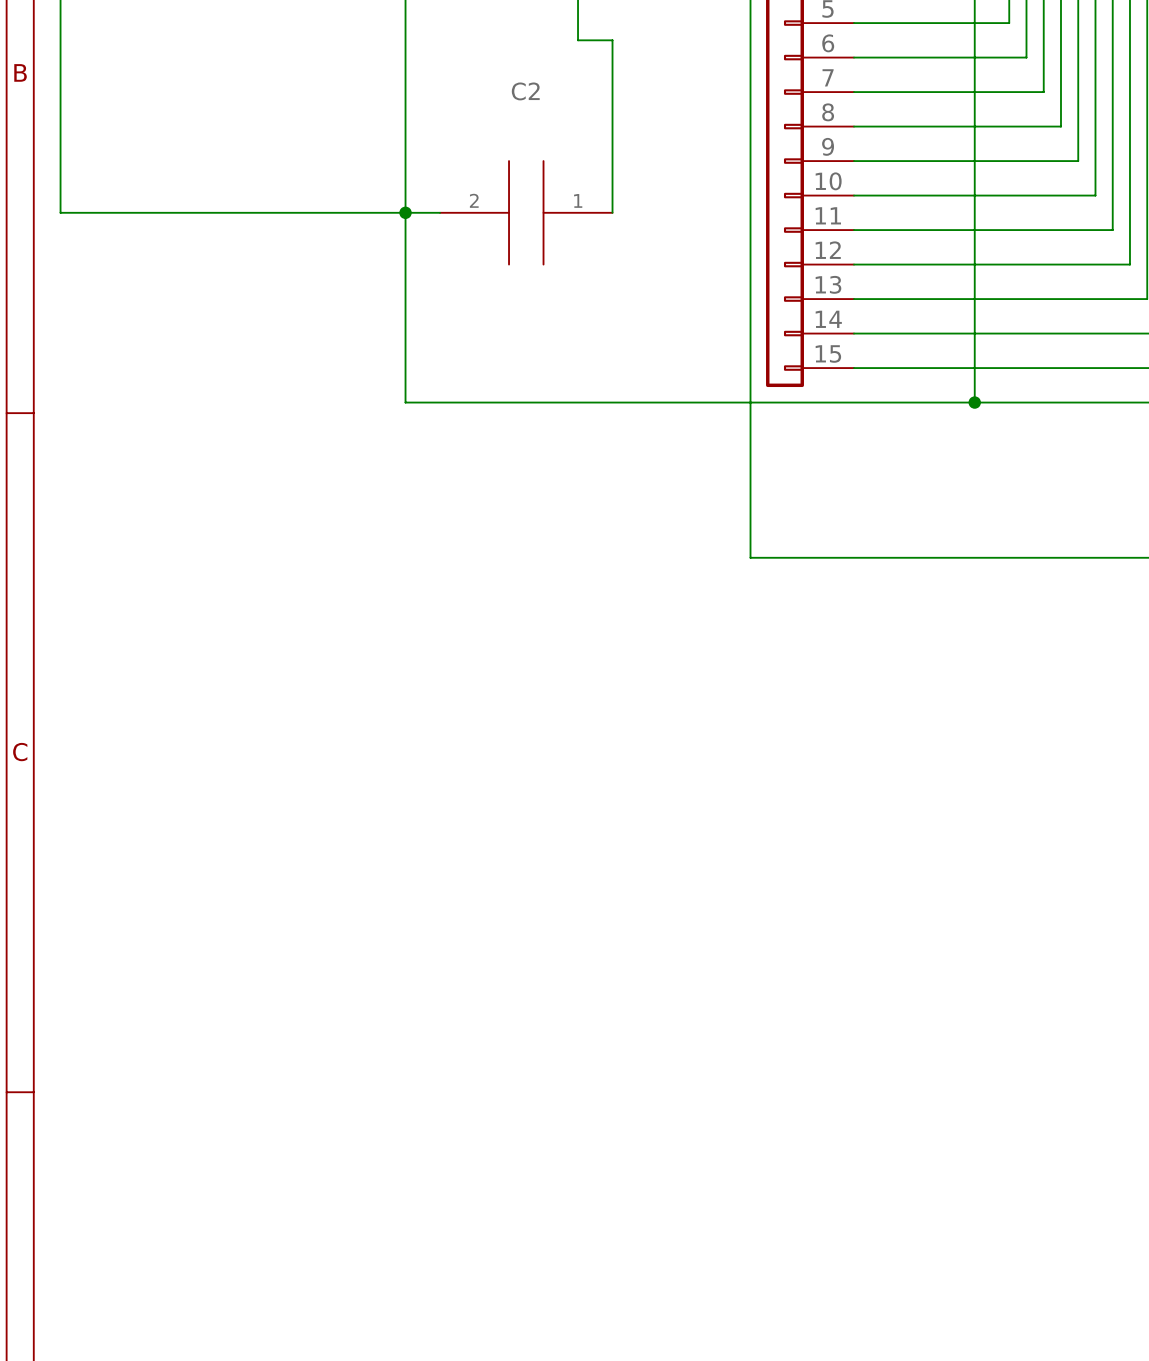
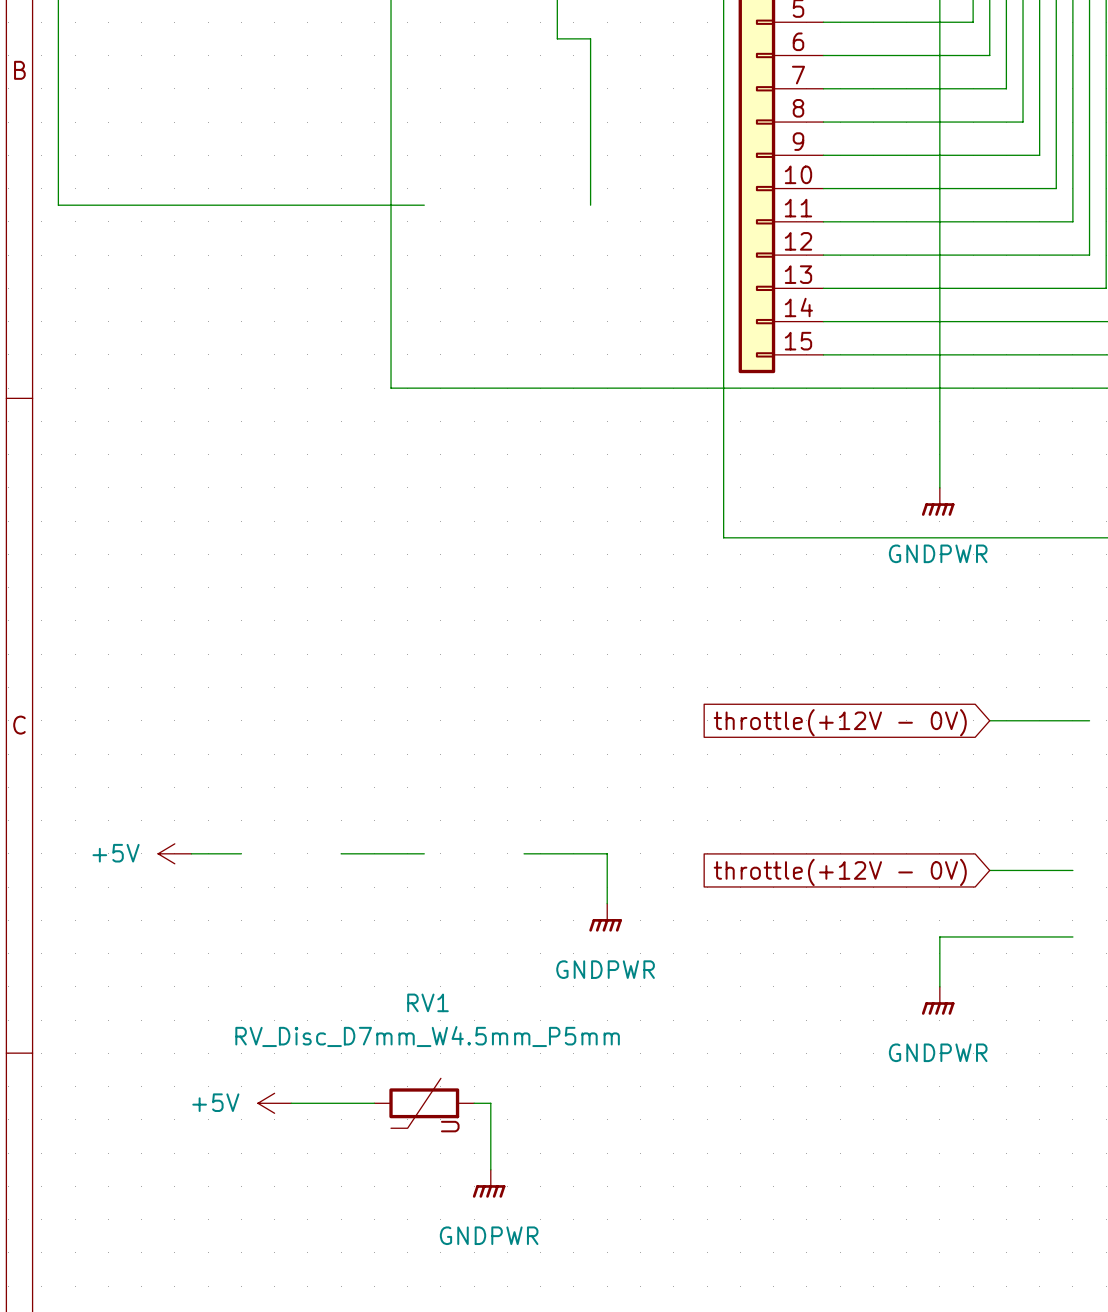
junction: (405, 212) -> none
C2: (526, 212) -> none
wire: none -> (939, 388) (939, 487)
junction: (974, 402) -> none
power symbol: none -> GNDPWR (938, 501)
wire: none -> (989, 720) (1089, 720)
global label: none -> throttle(+12V - 0V) (840, 722)
power symbol: none -> +5V (174, 853)
wire: none -> (191, 853) (241, 853)
wire: none -> (341, 853) (424, 853)
wire: none -> (524, 853) (607, 853) (607, 903)
wire: none -> (989, 870) (1072, 870)
global label: none -> throttle(+12V - 0V) (840, 872)
power symbol: none -> GNDPWR (605, 917)
wire: none -> (1072, 936) (939, 936) (939, 986)
power symbol: none -> GNDPWR (938, 1000)
power symbol: none -> +5V (274, 1103)
wire: none -> (291, 1103) (374, 1103)
RV1: none -> RV_Disc_D7mm_W4.5mm_P5mm (424, 1103)
wire: none -> (474, 1103) (490, 1103) (490, 1169)
power symbol: none -> GNDPWR (489, 1183)

